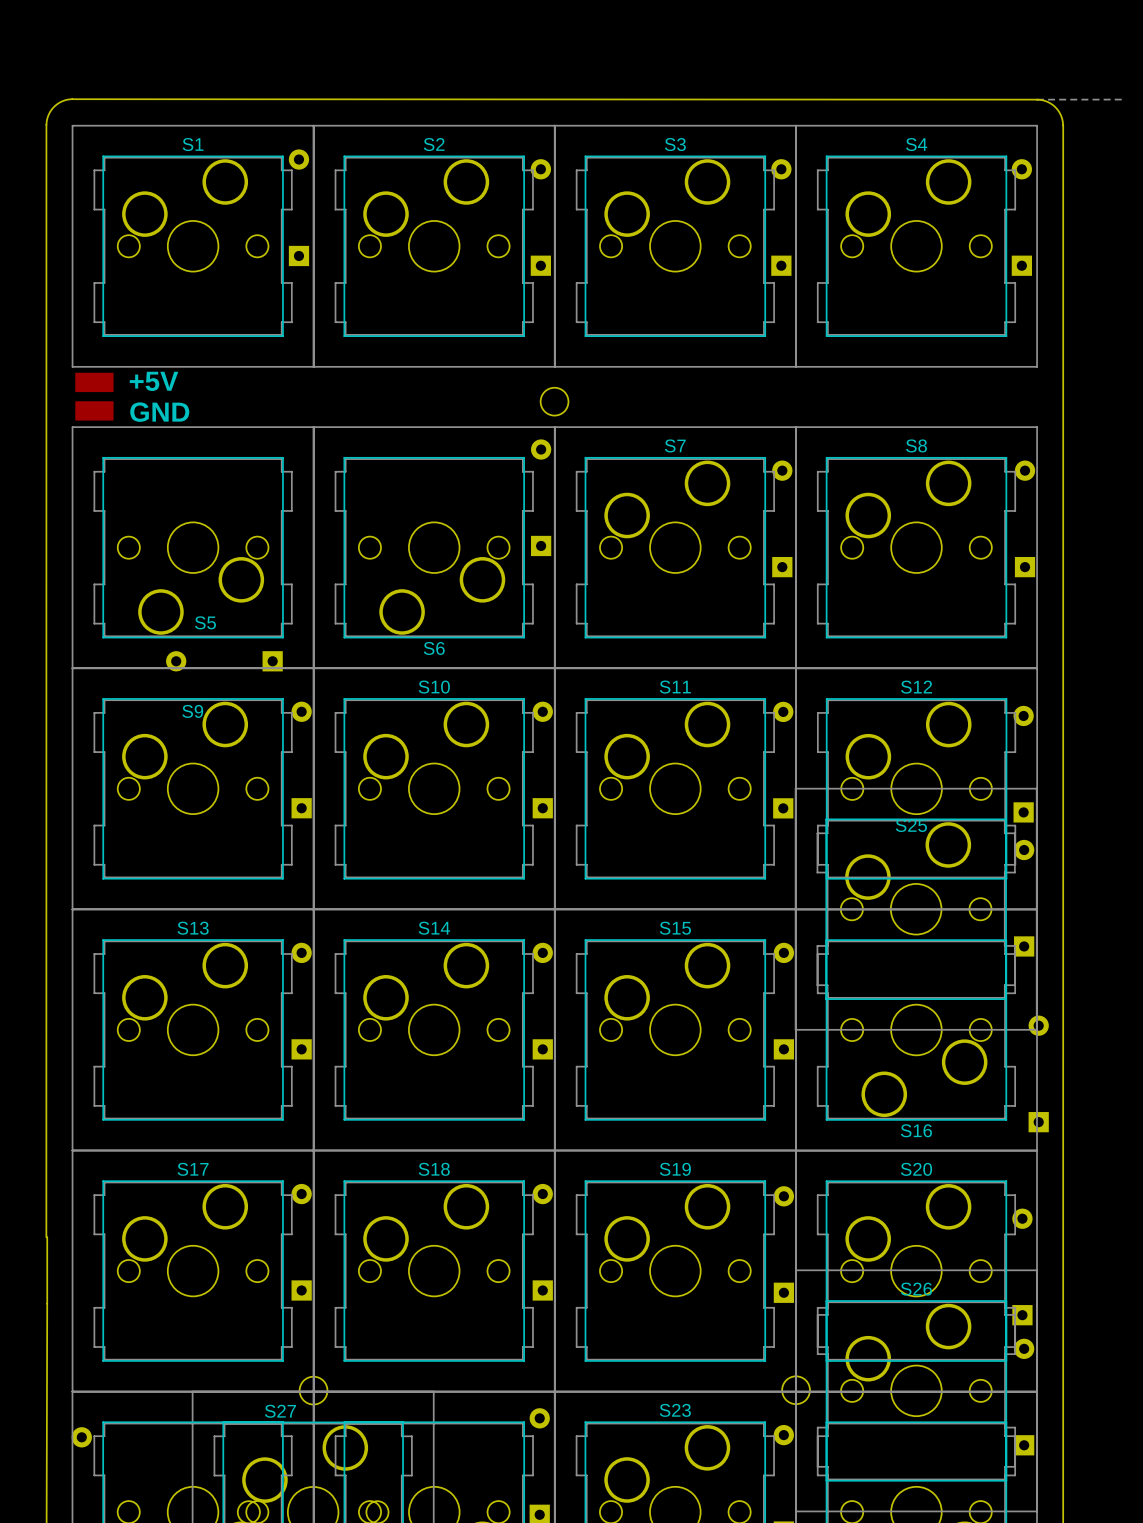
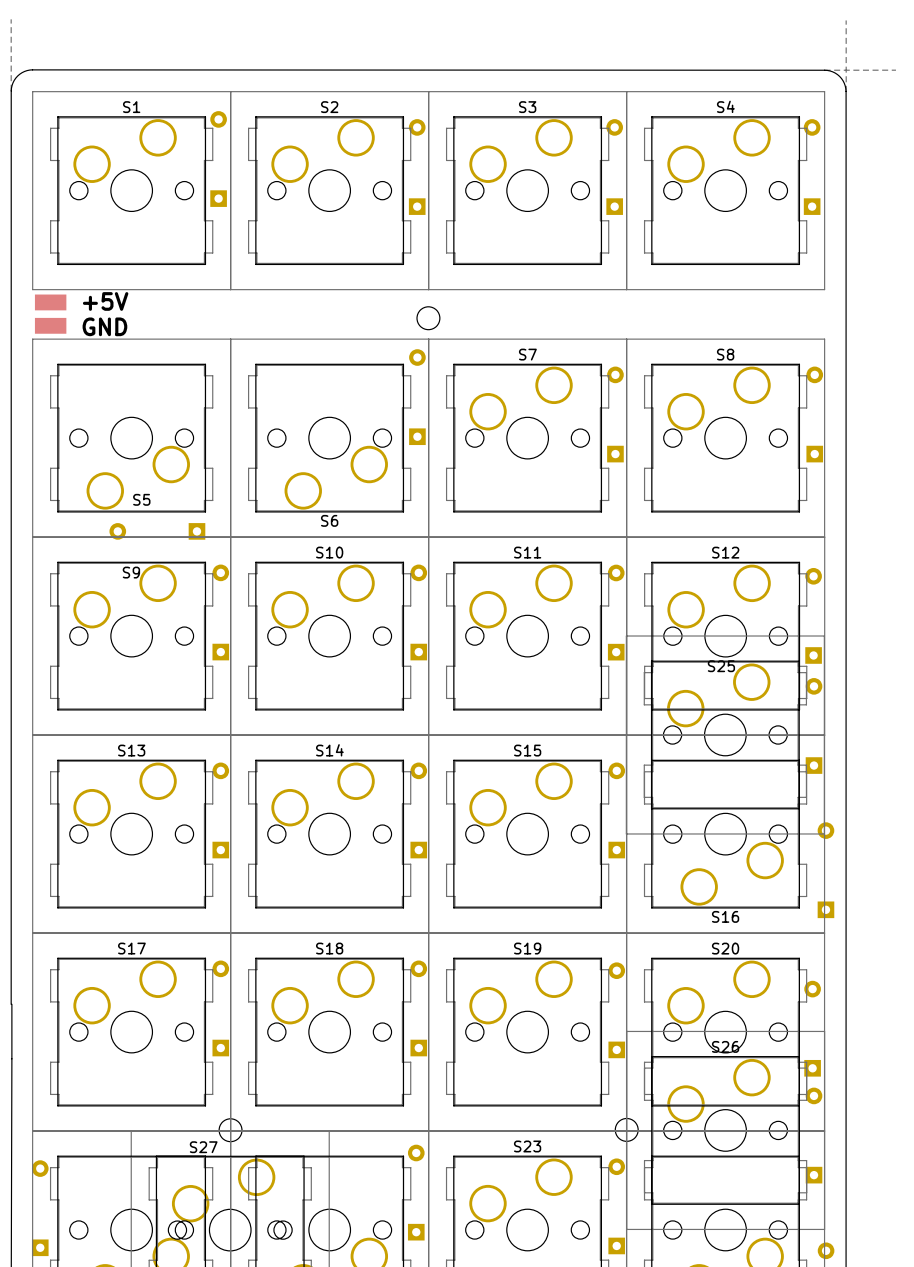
line: none -> (11, 19) (11, 90)
line: none -> (846, 20) (846, 91)

